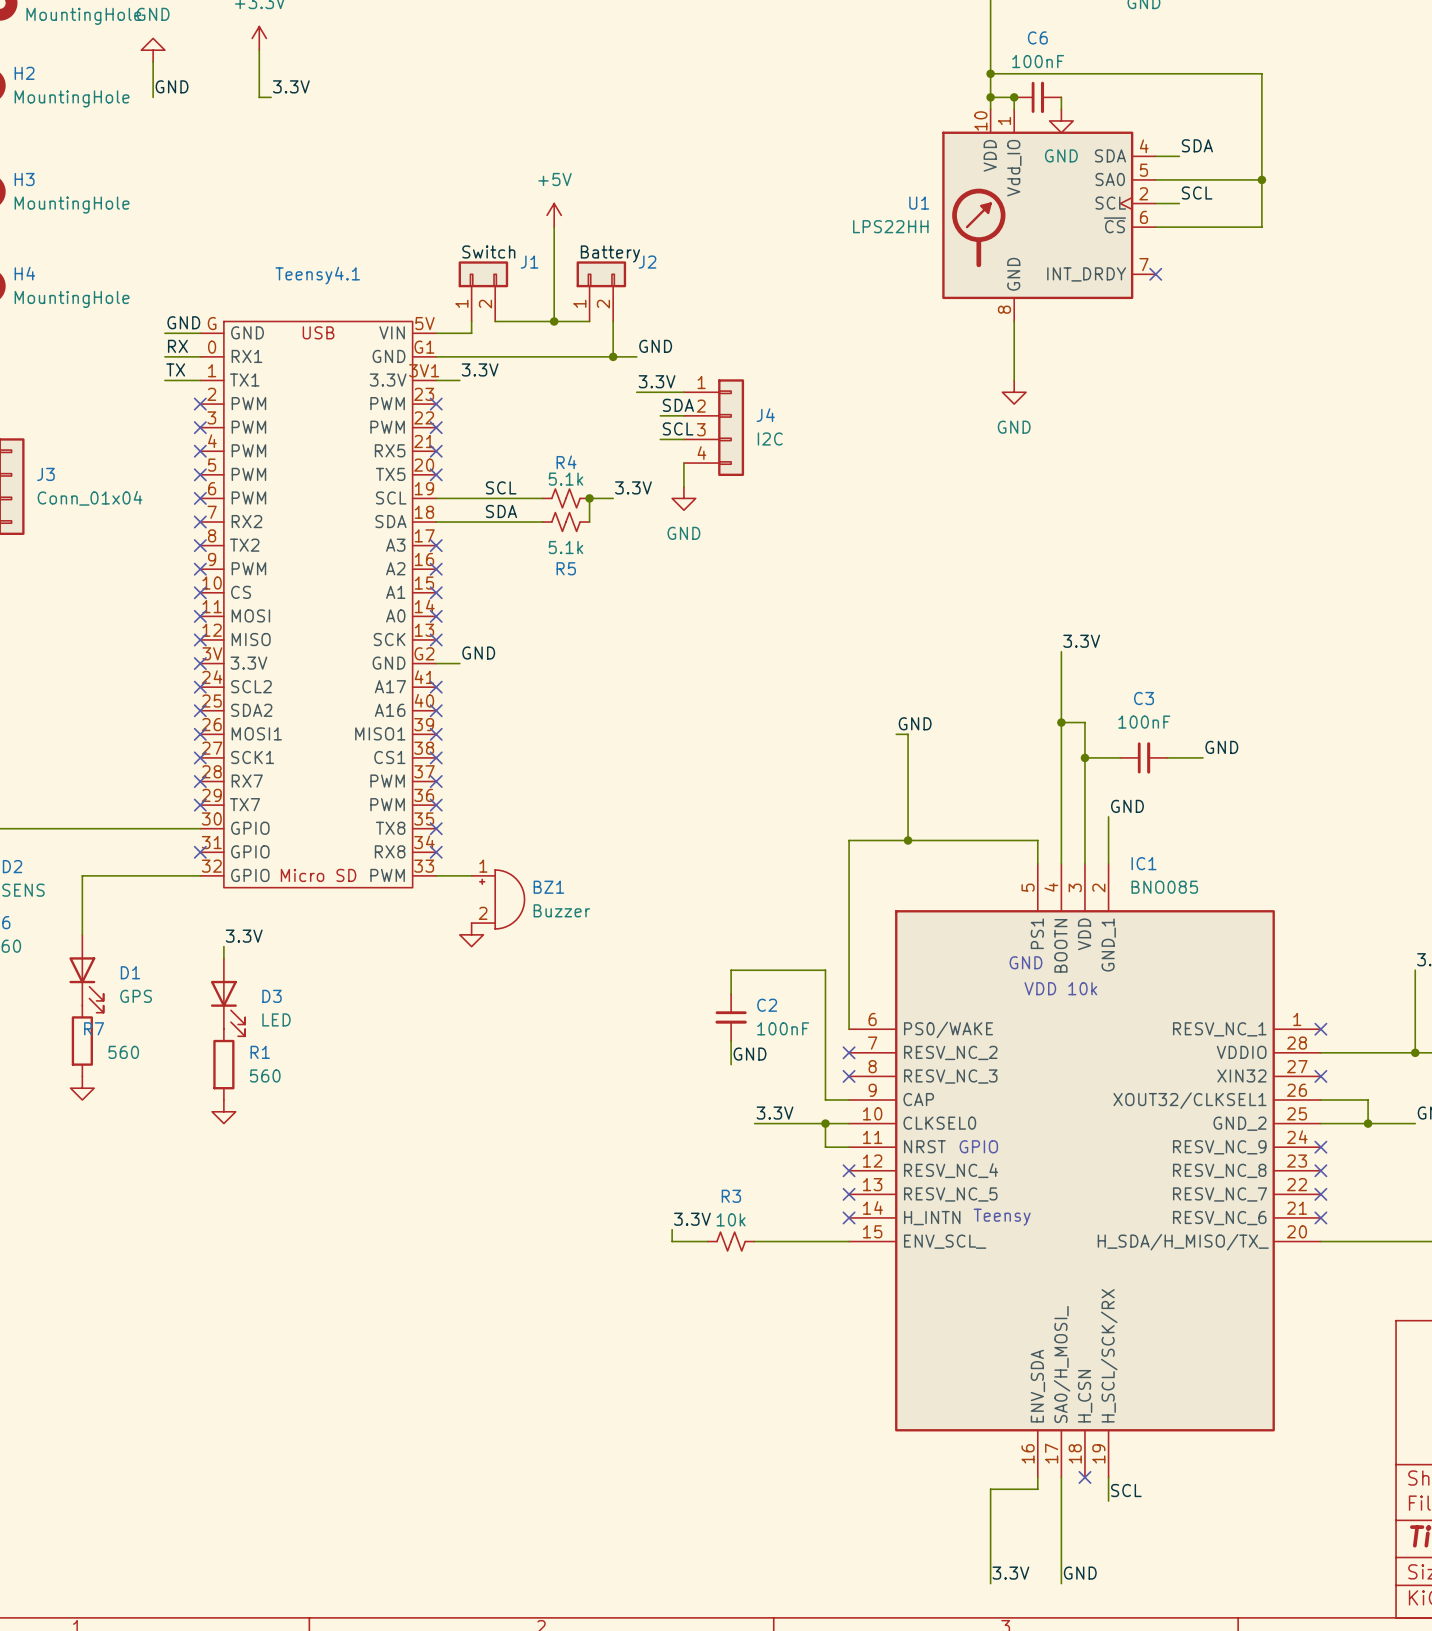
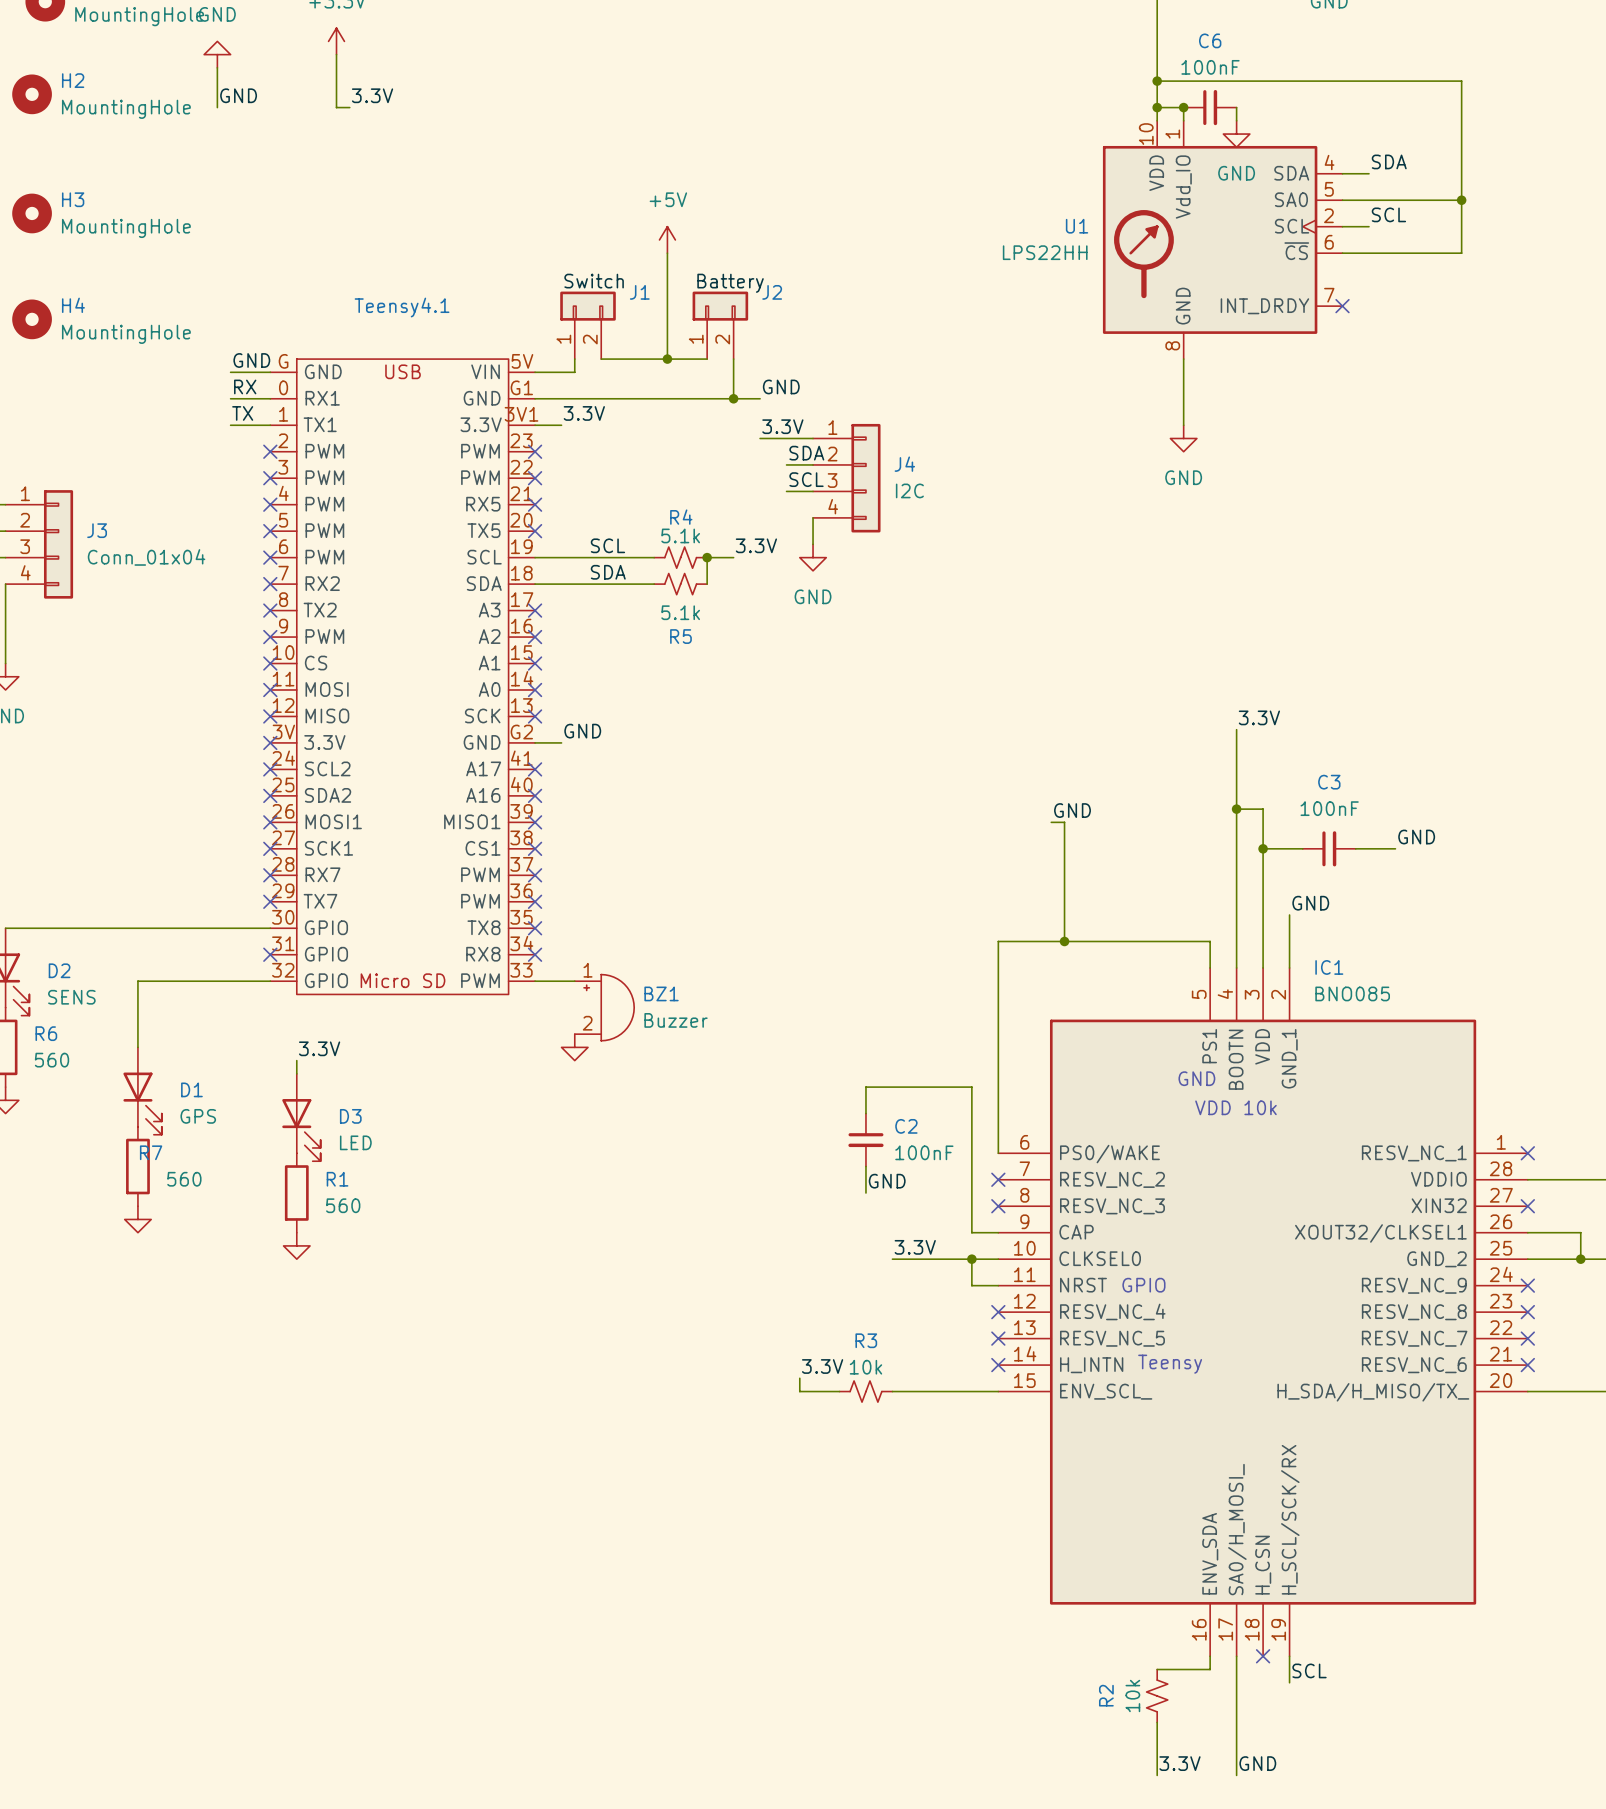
R2: none -> 10k (1157, 1695)

